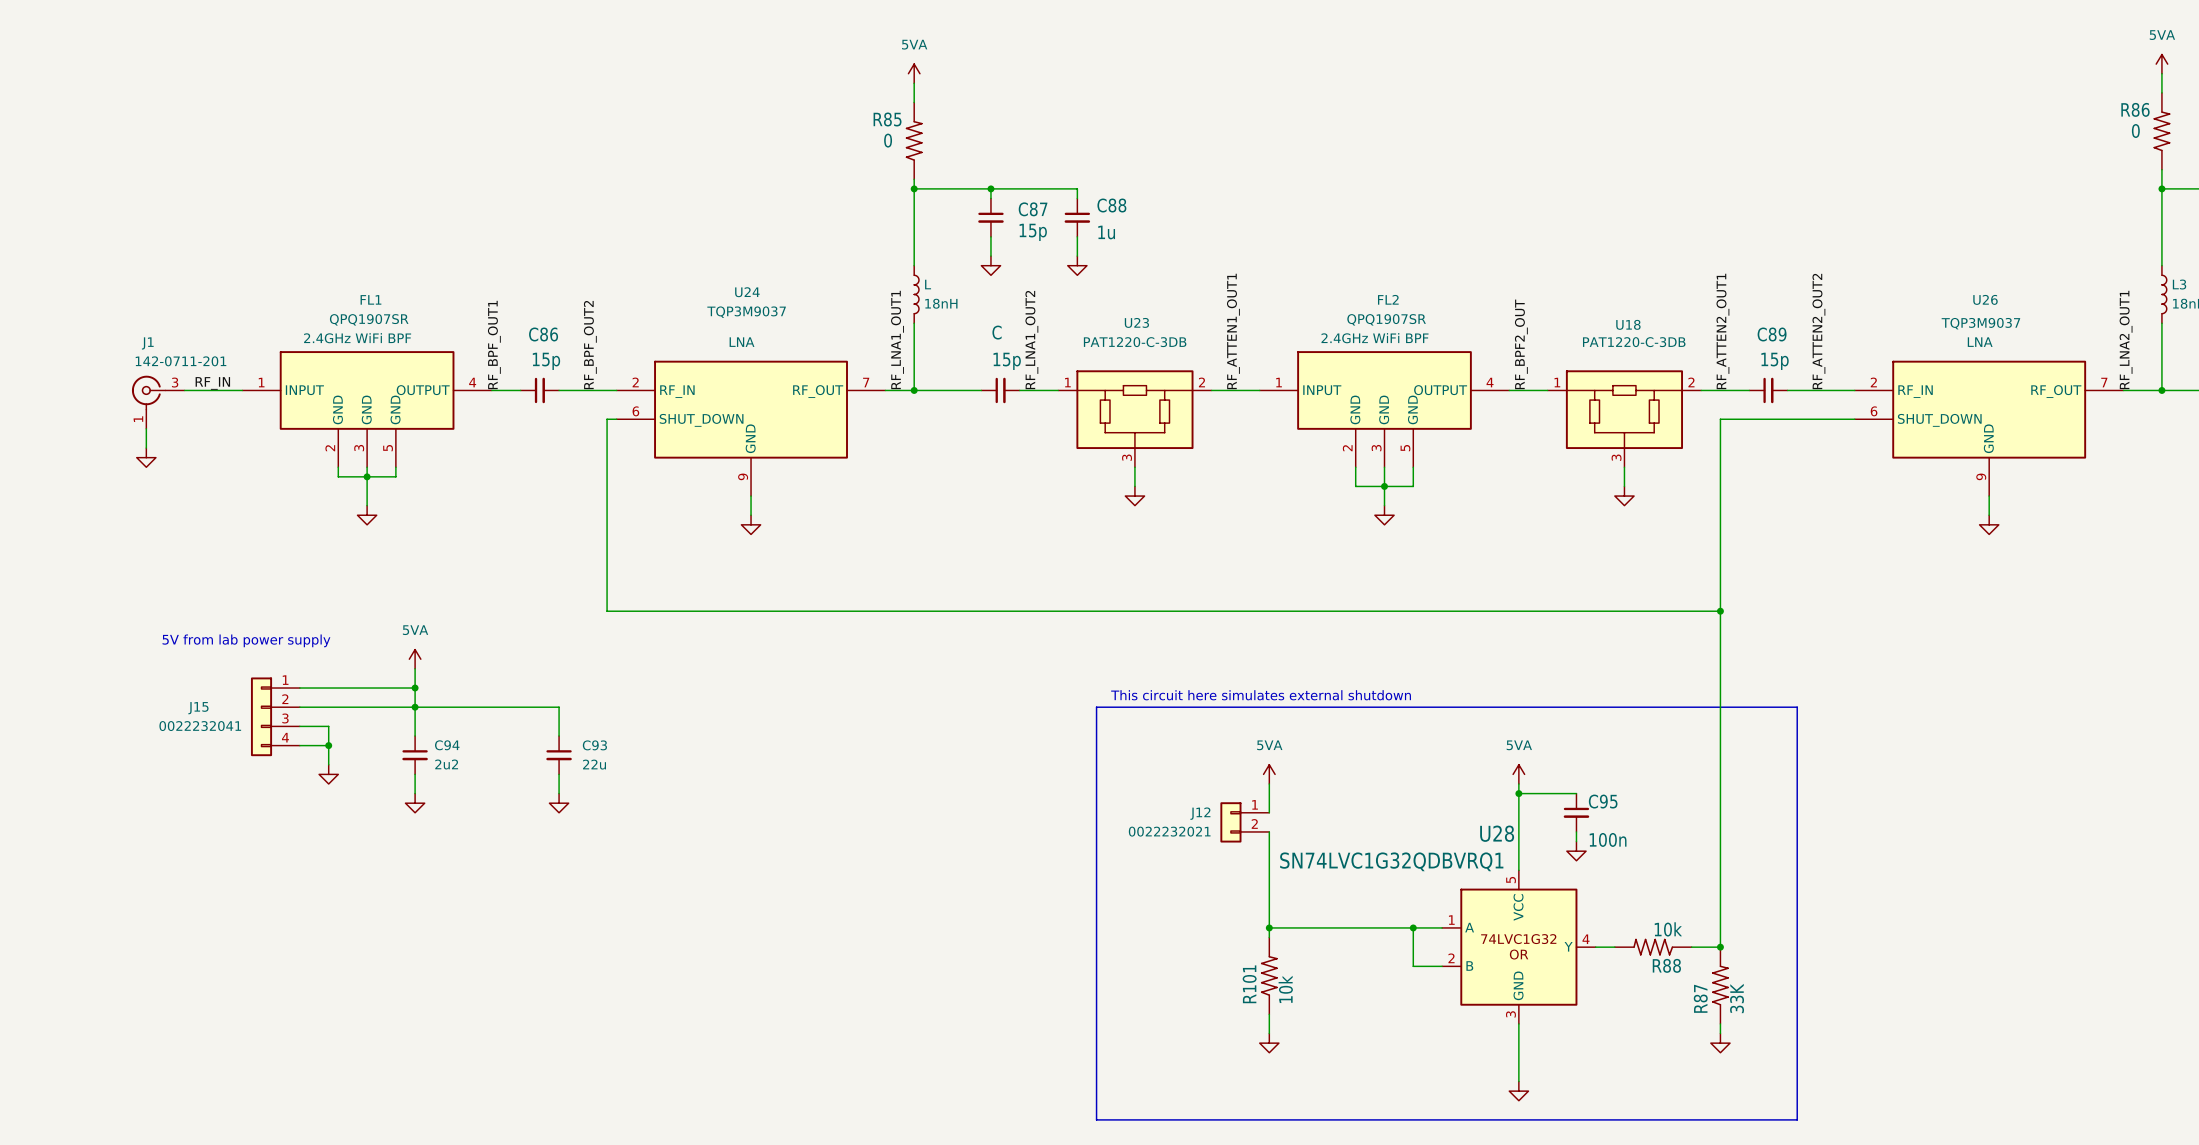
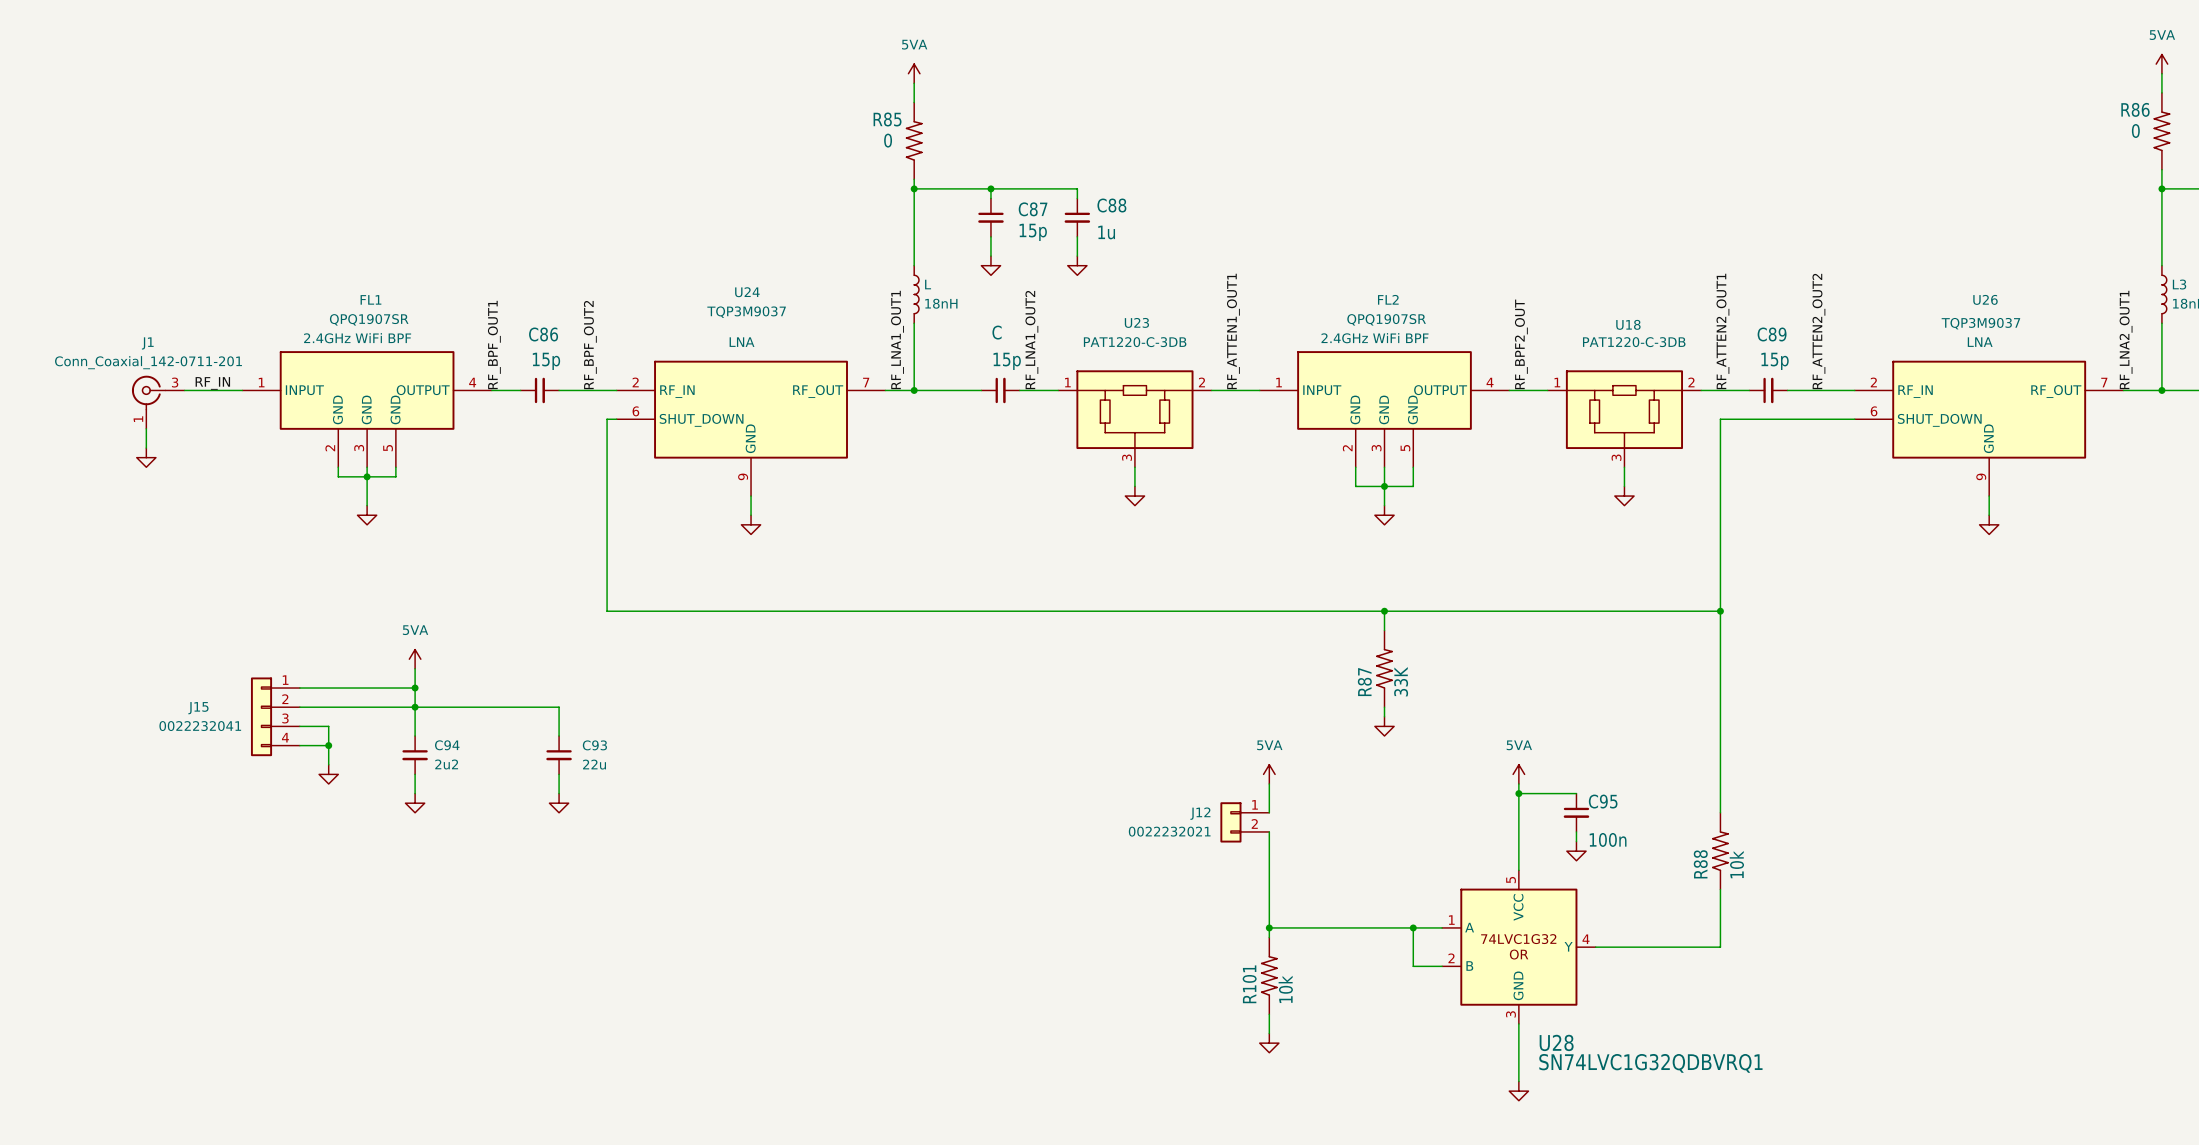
J1 value: 142-0711-201 (181, 361) -> Conn_Coaxial_142-0711-201 (148, 362)
wire: none -> (1384, 611) (1384, 630)
junction: none -> (1384, 611)
text: 5V from lab power supply (246, 640) -> none
text: This circuit here simulates external shutdown (1261, 695) -> none
line: (1096, 707) (1797, 707) (1797, 1119) (1096, 1119) (1096, 707) -> none
wire: none -> (1384, 707) (1384, 716)
power symbol: none -> (1384, 726)
U28 name position: U28 (1497, 833) -> U28 (1556, 1042)
U28 value position: SN74LVC1G32QDBVRQ1 (1391, 861) -> SN74LVC1G32QDBVRQ1 (1650, 1063)
R88 rotation: 0° (1653, 947) -> 90° clockwise (1720, 851)
R88 position: (1653, 947) -> (1720, 851)
junction: (1720, 947) -> none
R87 position: (1720, 985) -> (1384, 668)
wire: (1720, 1023) (1720, 1033) -> none
power symbol: (1720, 1043) -> none

